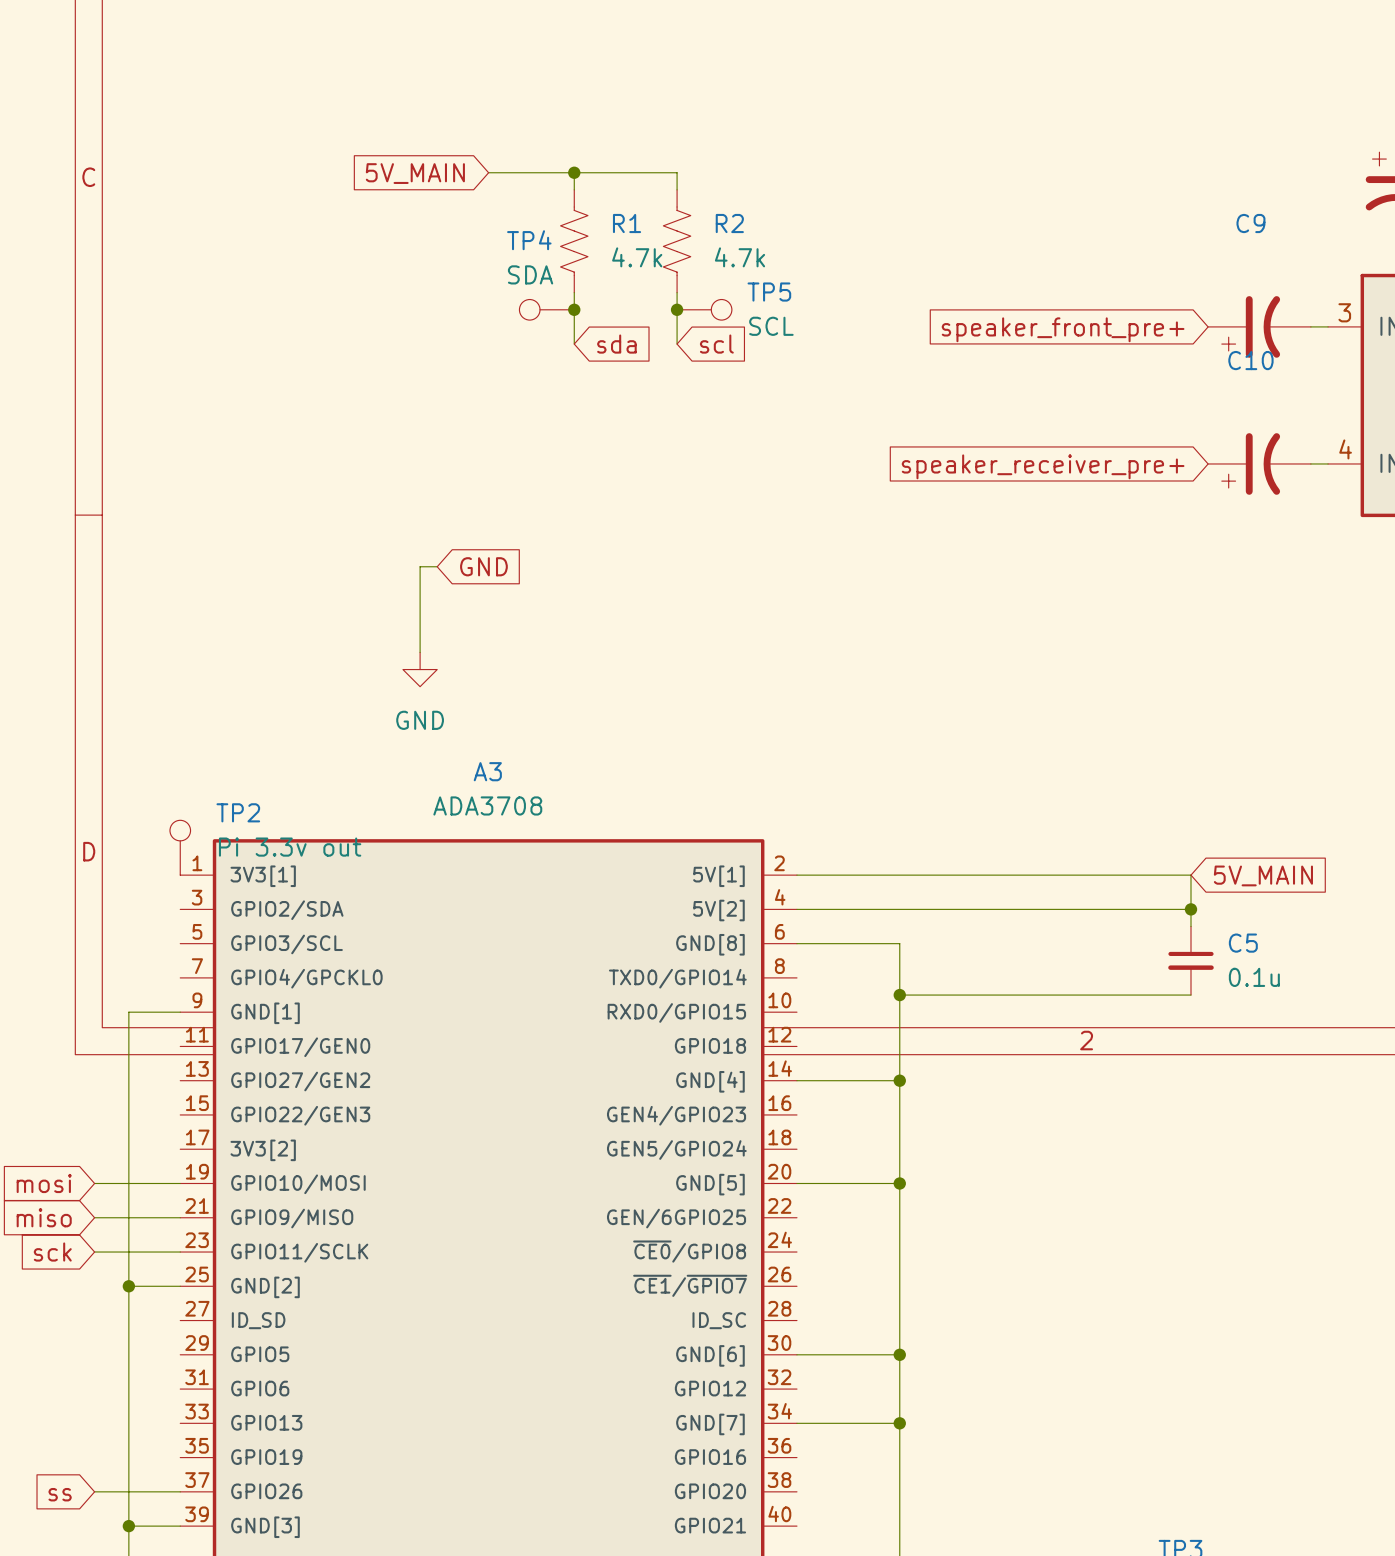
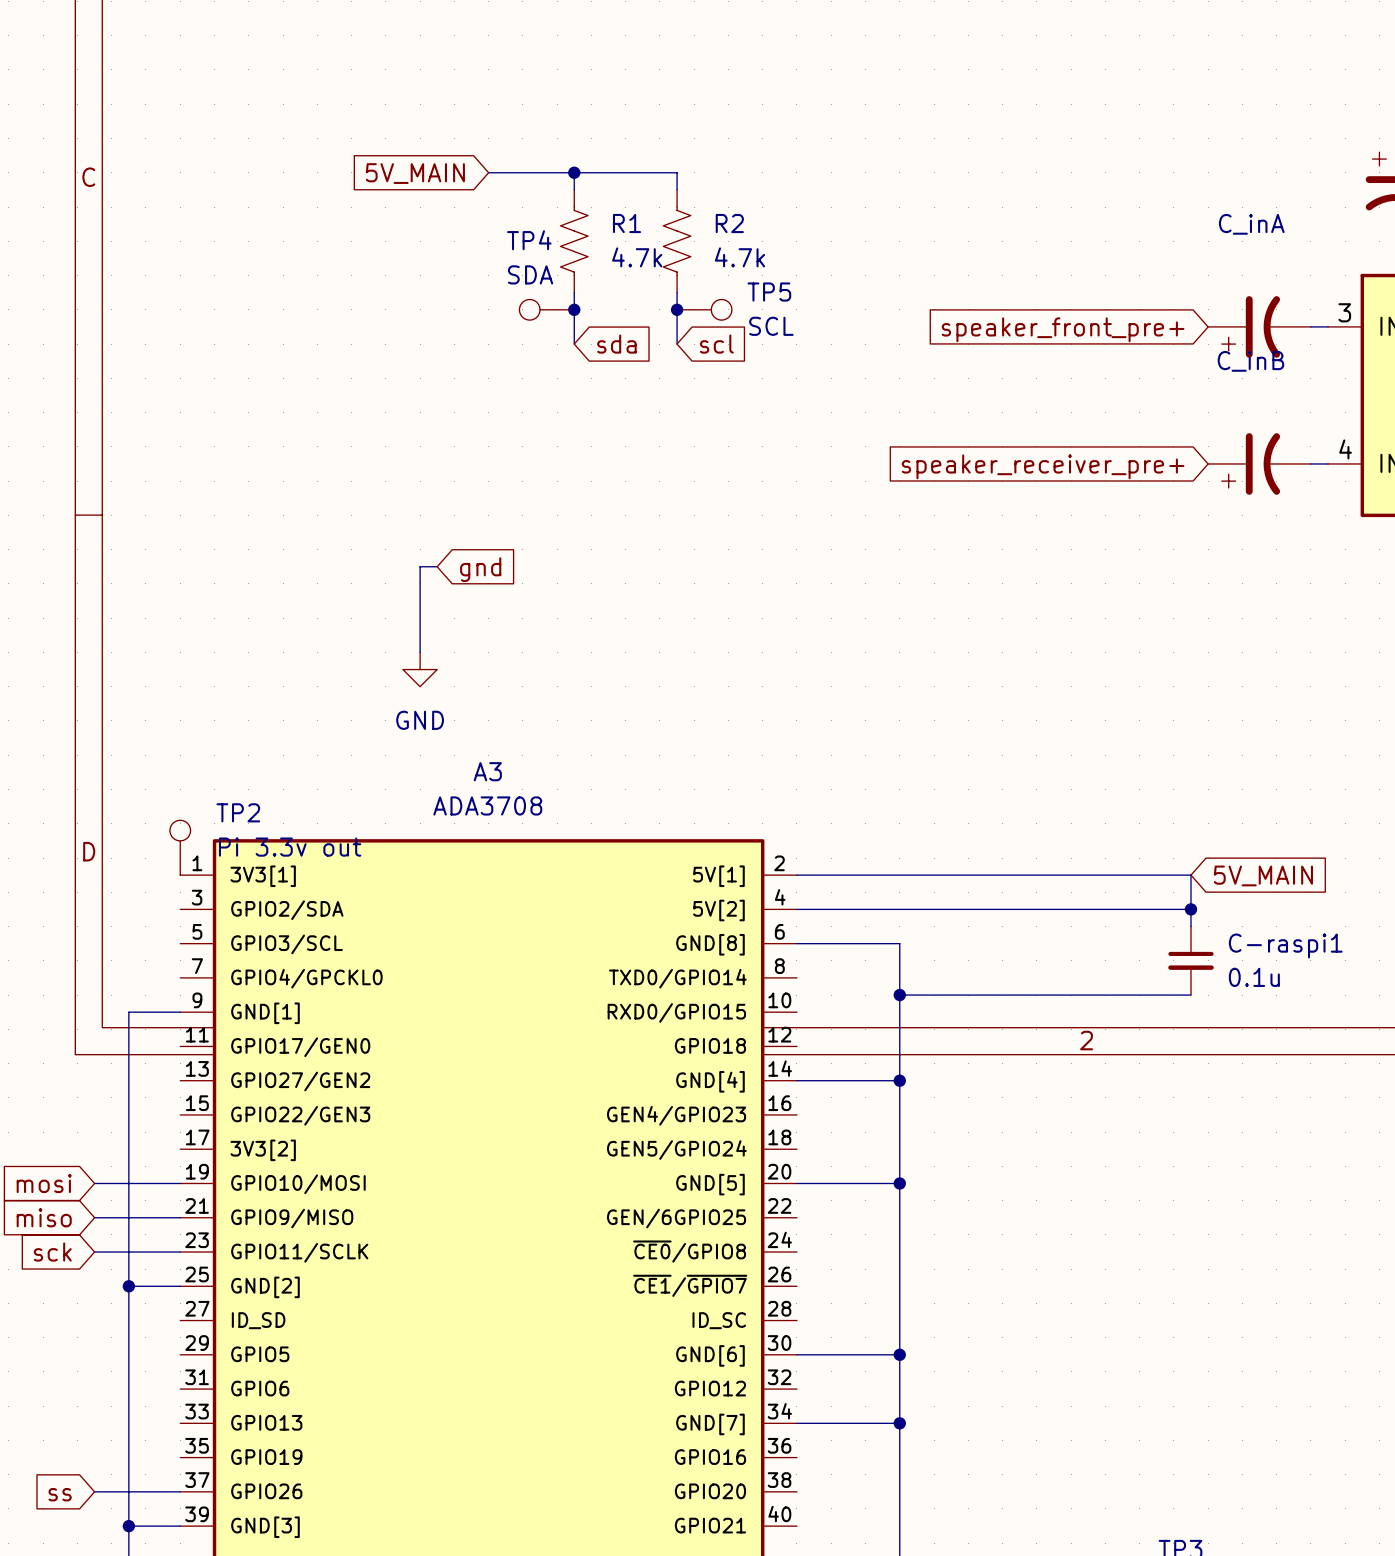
C9 name: C9 (1250, 223) -> C_inA (1251, 224)
C10 name: C10 (1250, 360) -> C_inB (1250, 361)
global label: GND (483, 566) -> gnd (480, 569)
C5 name: C5 (1243, 943) -> C-raspi1 (1285, 945)

